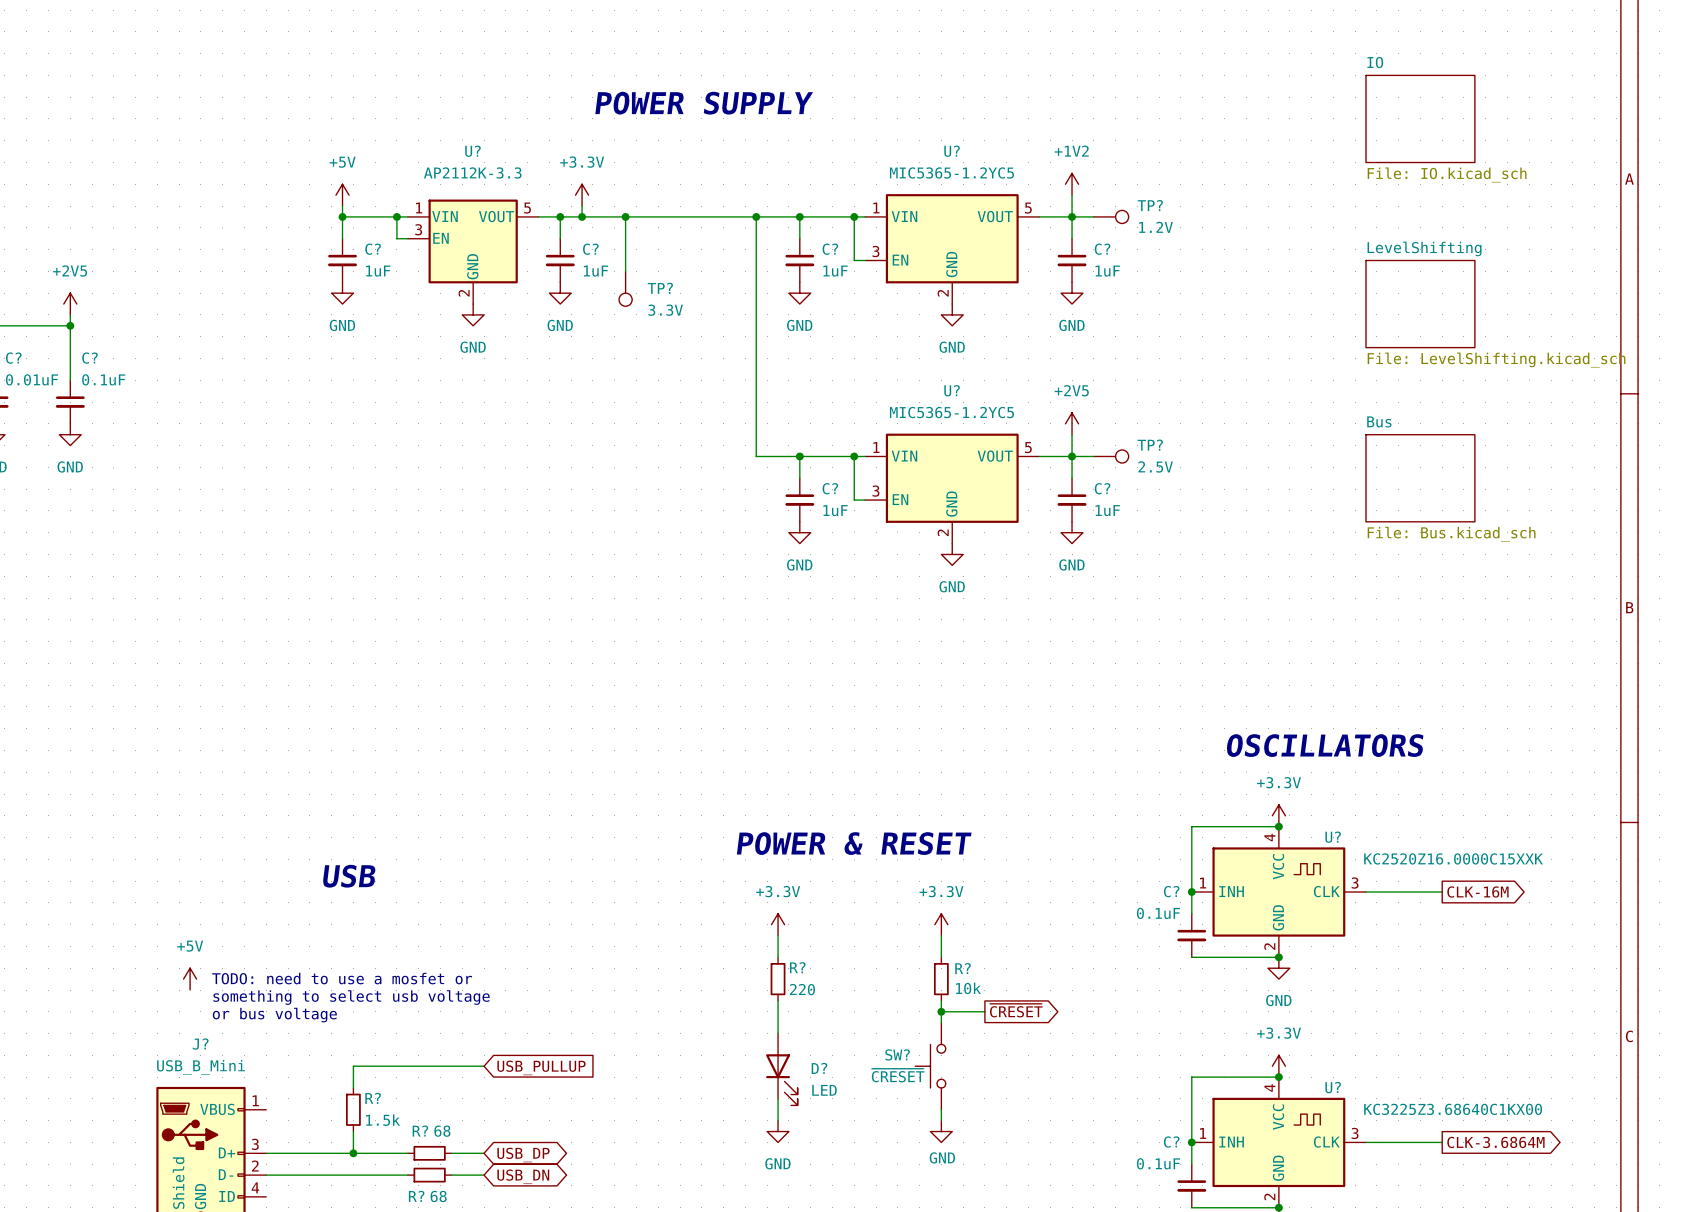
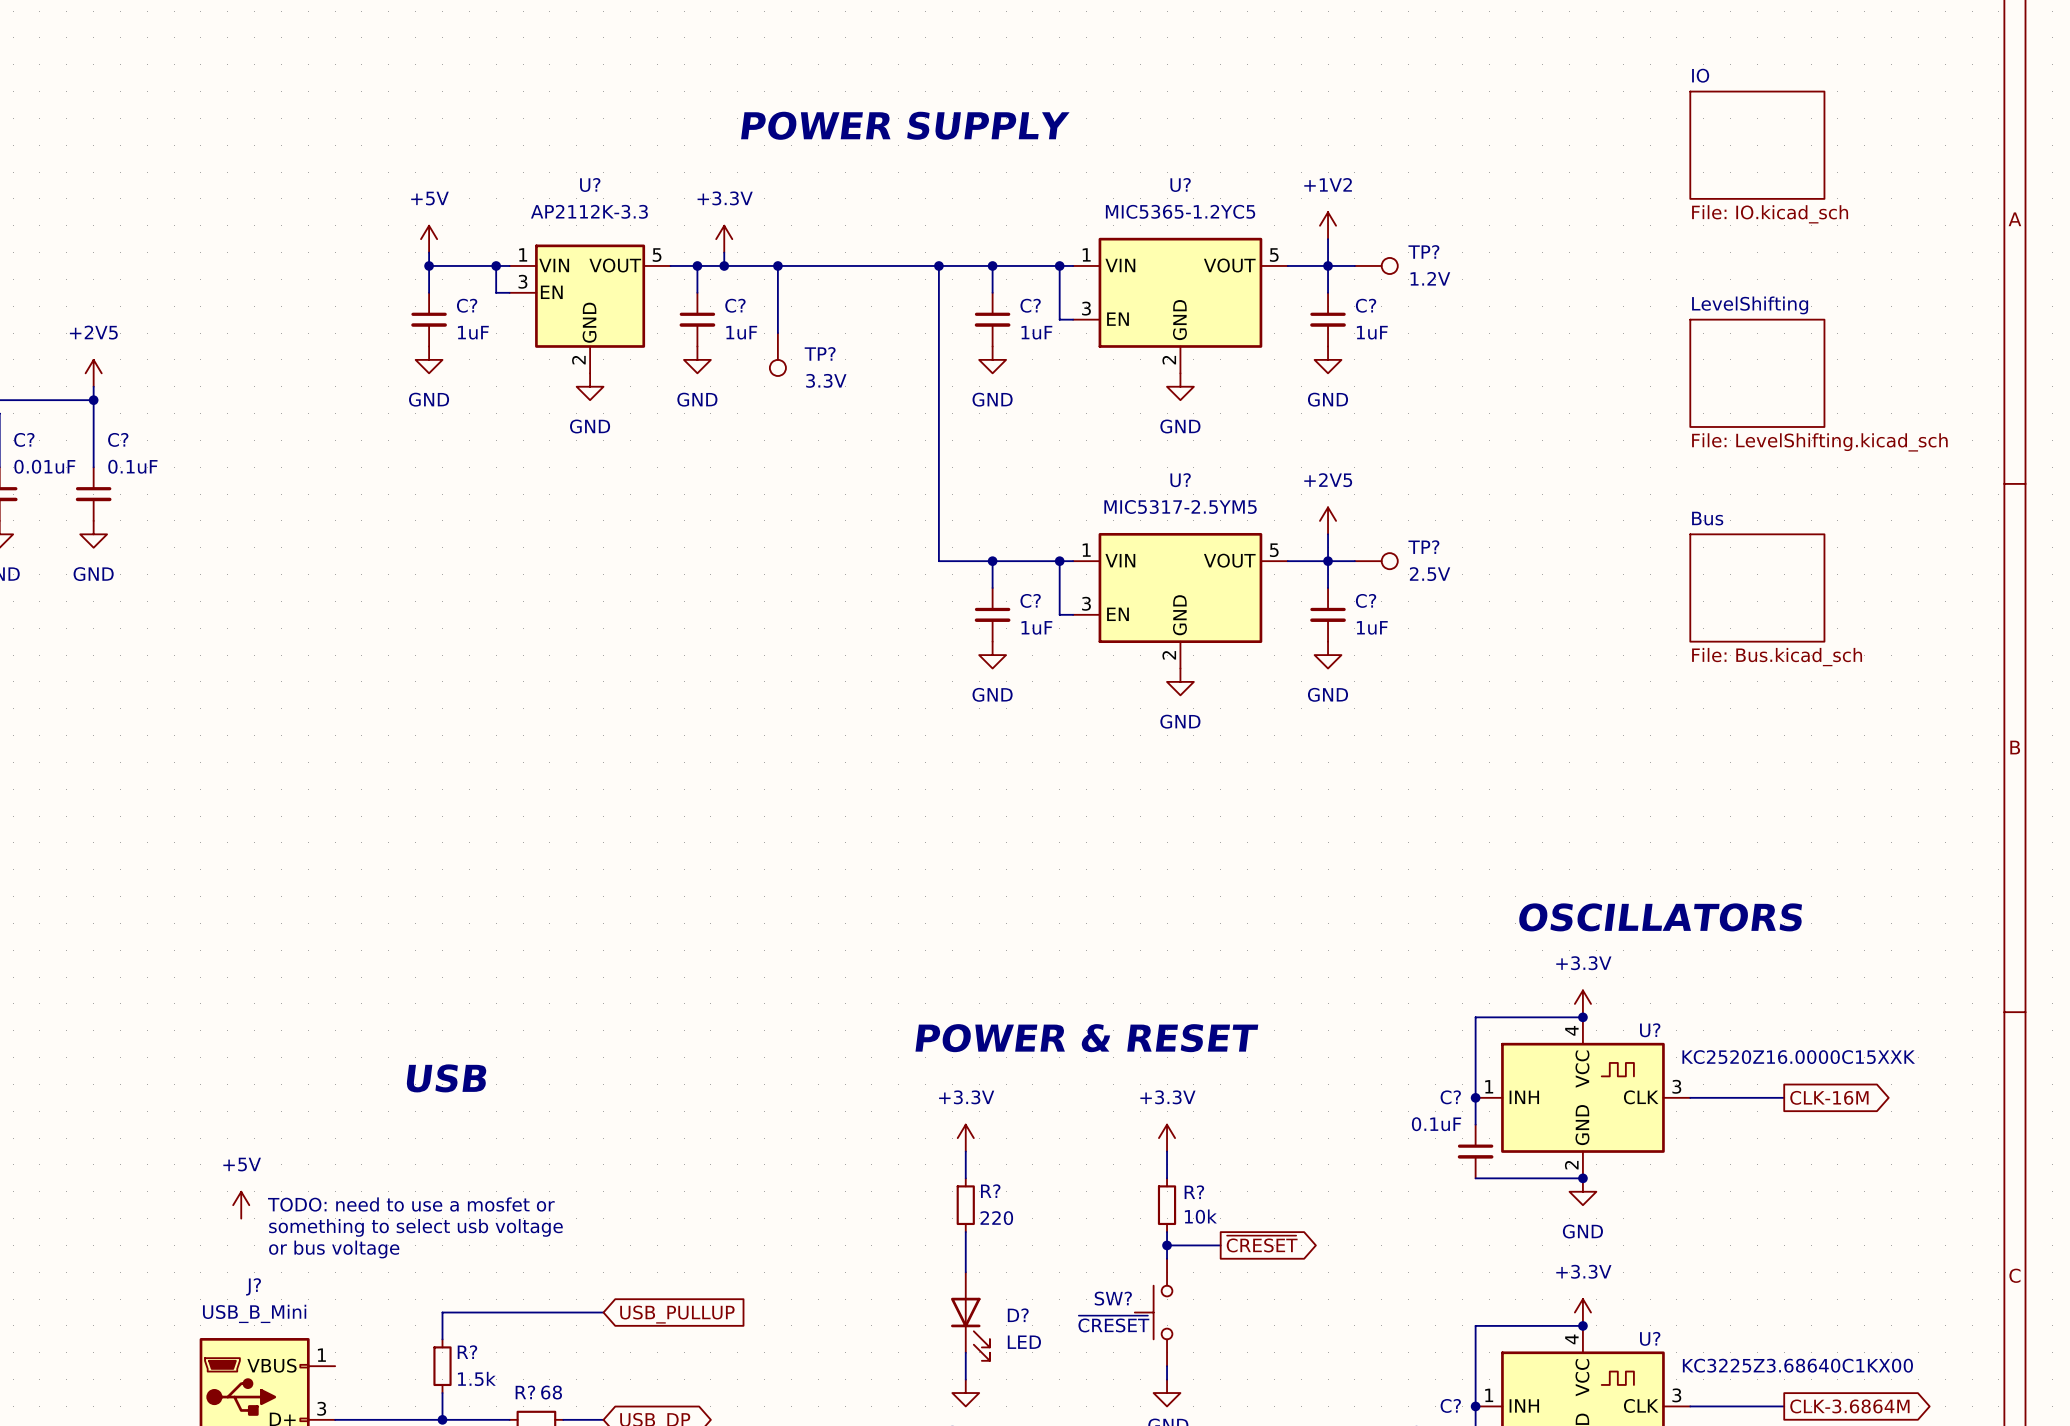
U? value: MIC5365-1.2YC5 (951, 412) -> MIC5317-2.5YM5 (1180, 507)

